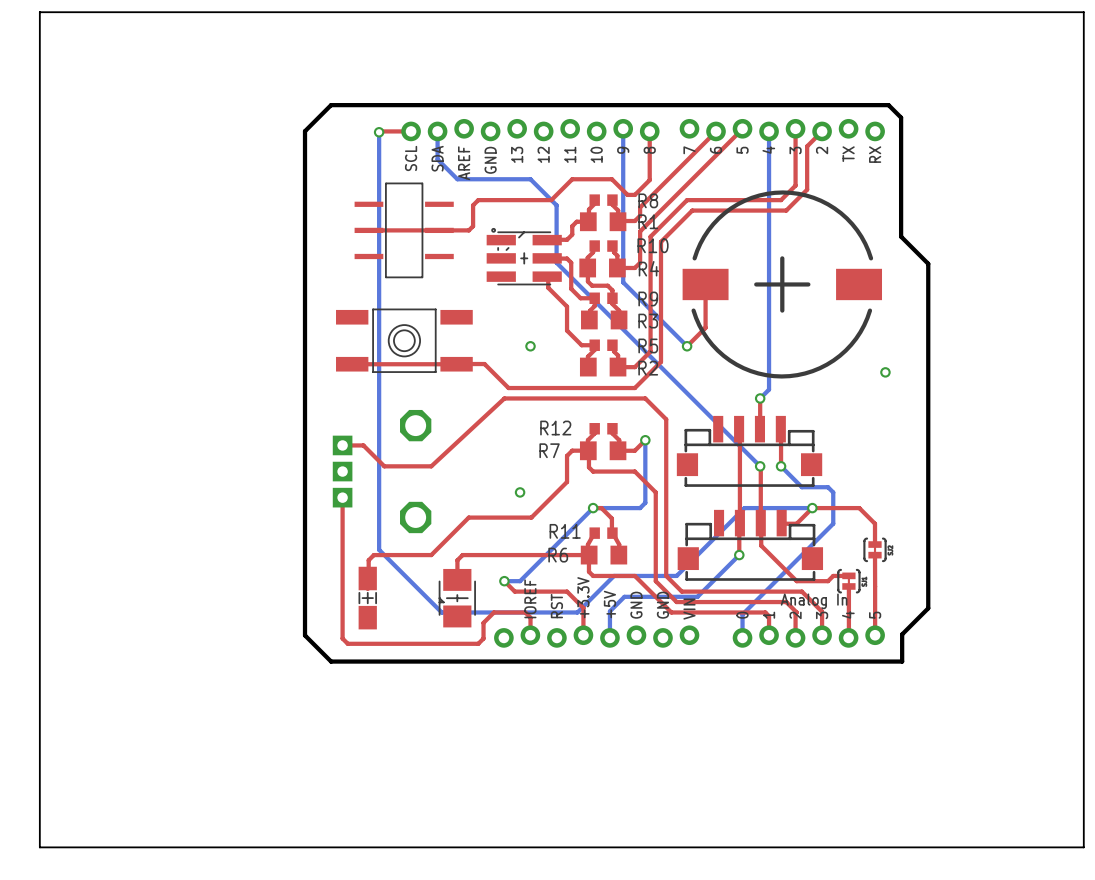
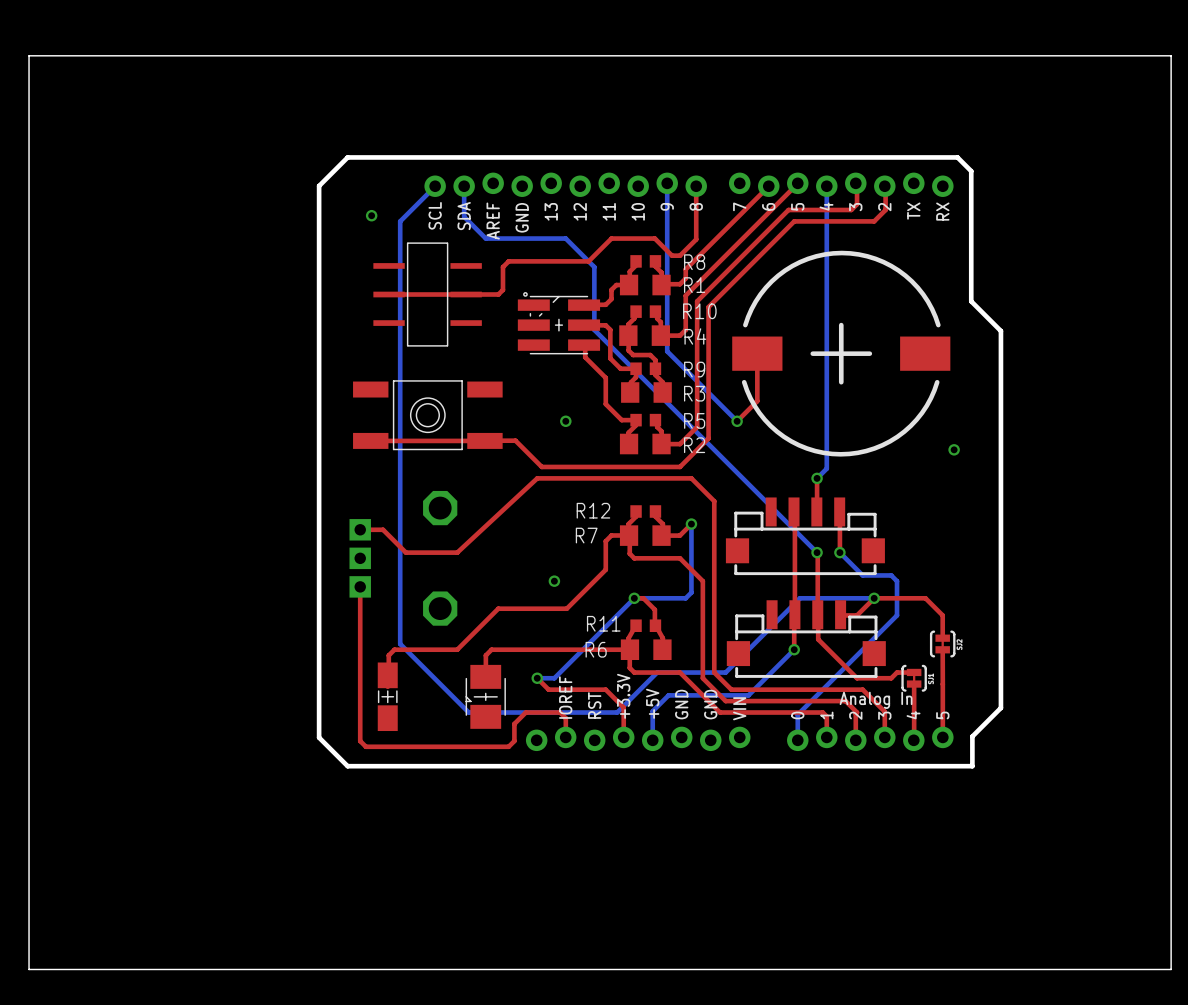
top track: (795, 128) (795, 185) (781, 200) (687, 200) -> (855, 183) (857, 204) (851, 209) (788, 209) (737, 261)
top track: (411, 131) (379, 132) -> none
top track: (822, 131) (807, 146) (807, 189) (786, 210) (692, 210) -> (884, 186) (885, 209) (874, 221) (794, 221) (742, 272)
bottom track: (379, 132) (379, 163) -> (435, 186) (400, 221)
via position: (379, 132) -> (371, 215)

